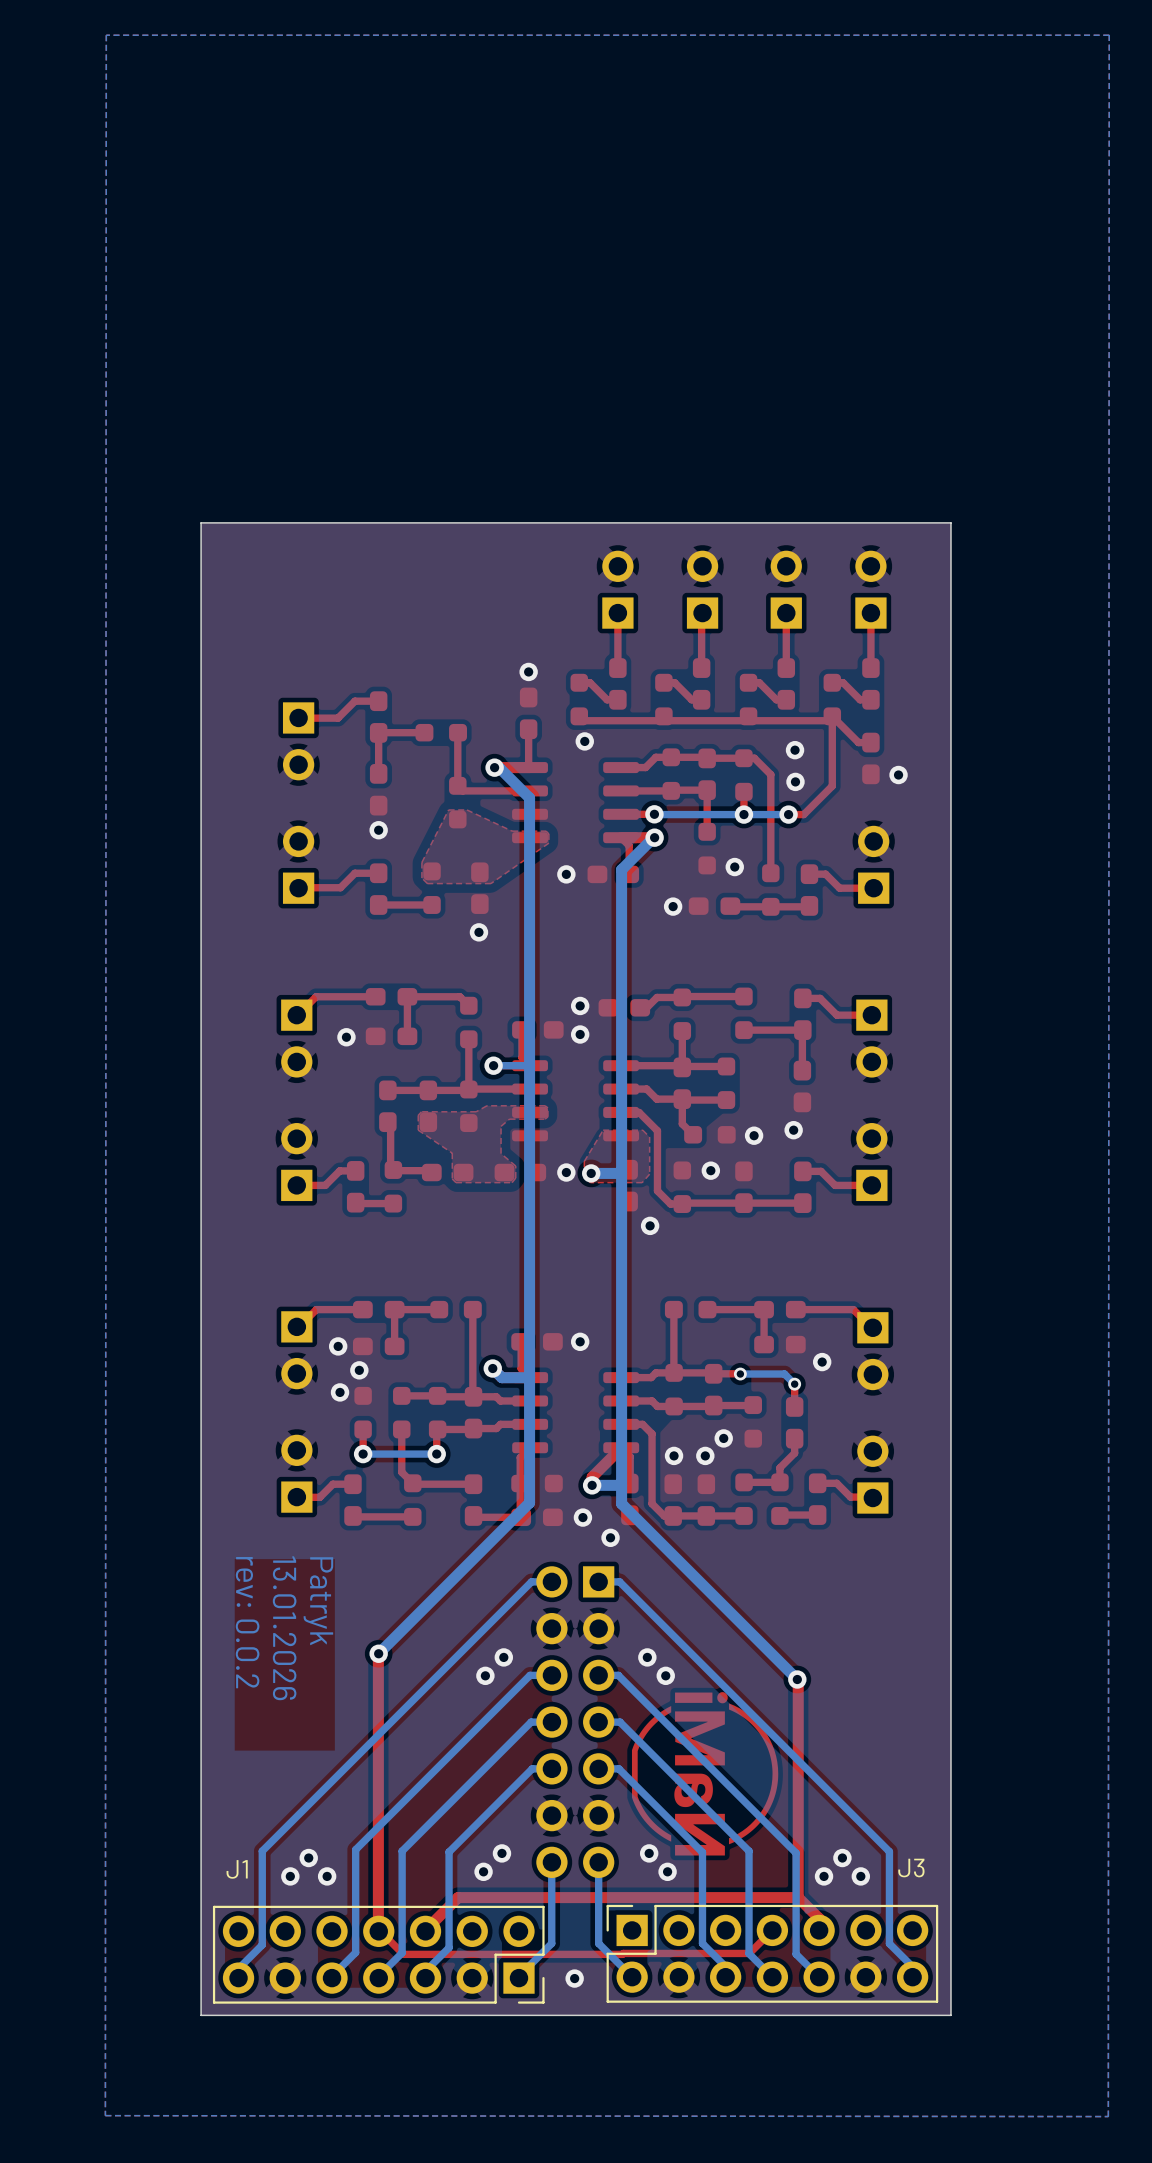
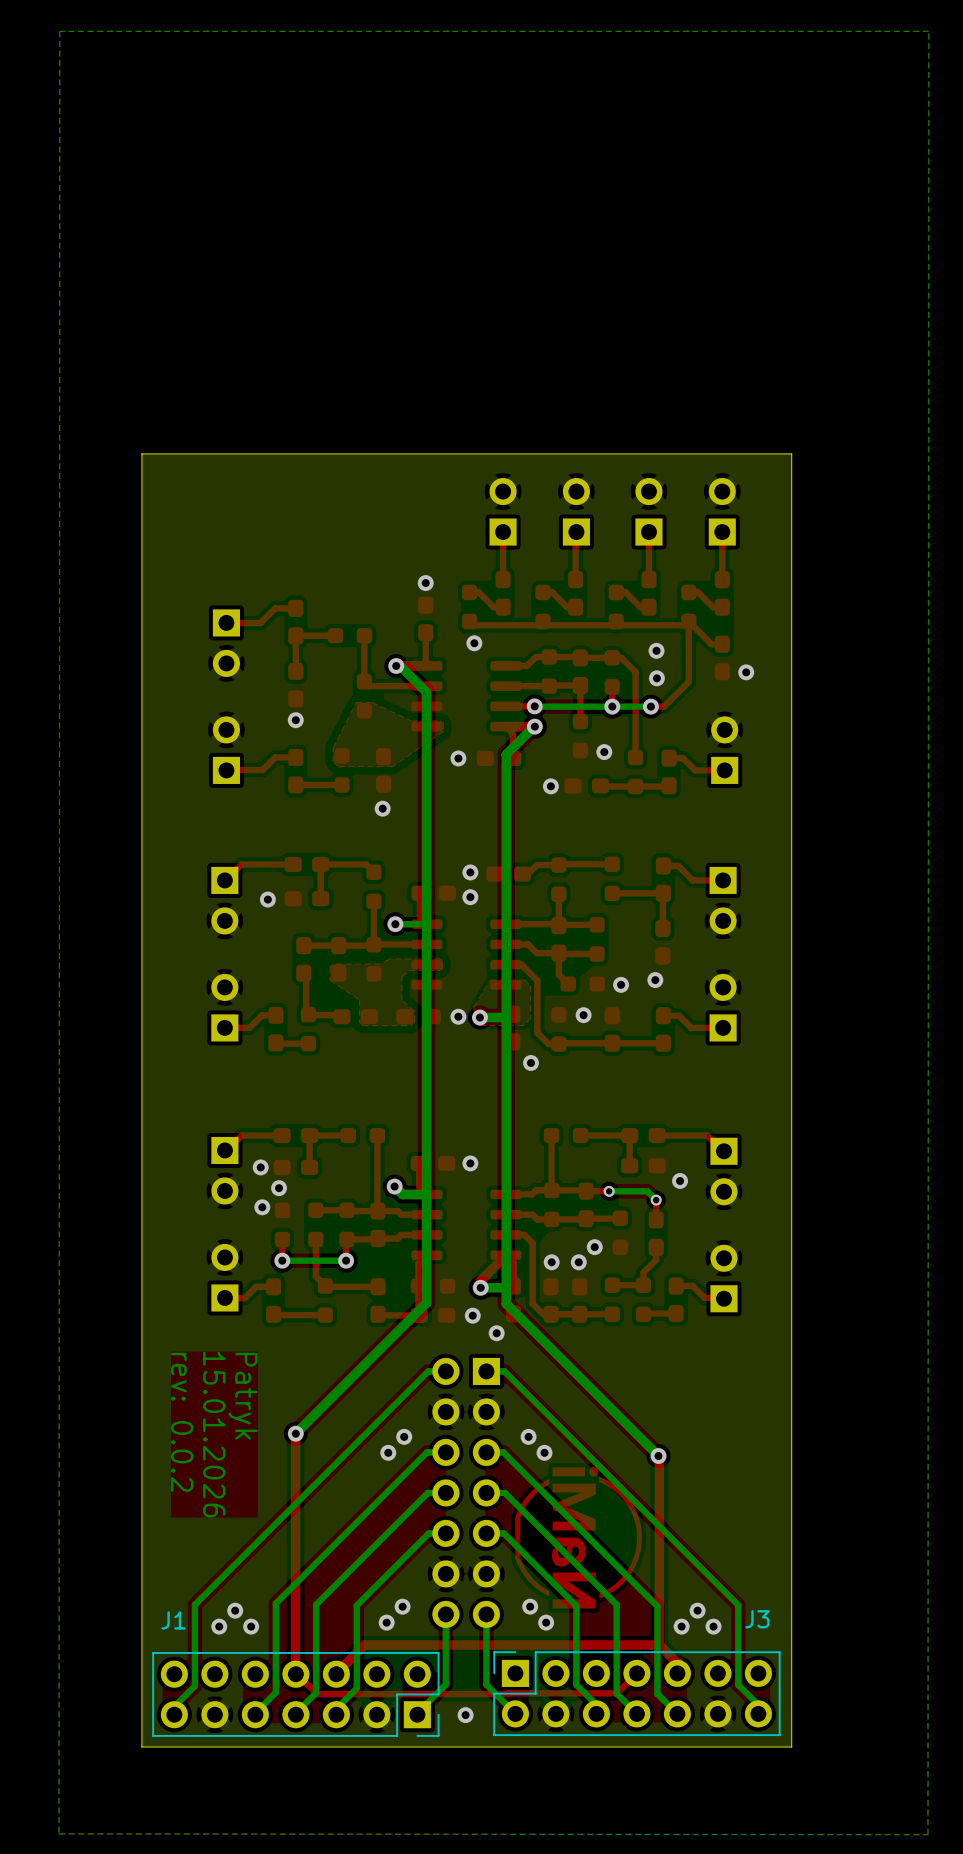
text: 13.01.2026 (284, 1628) -> 15.01.2026 (214, 1434)

